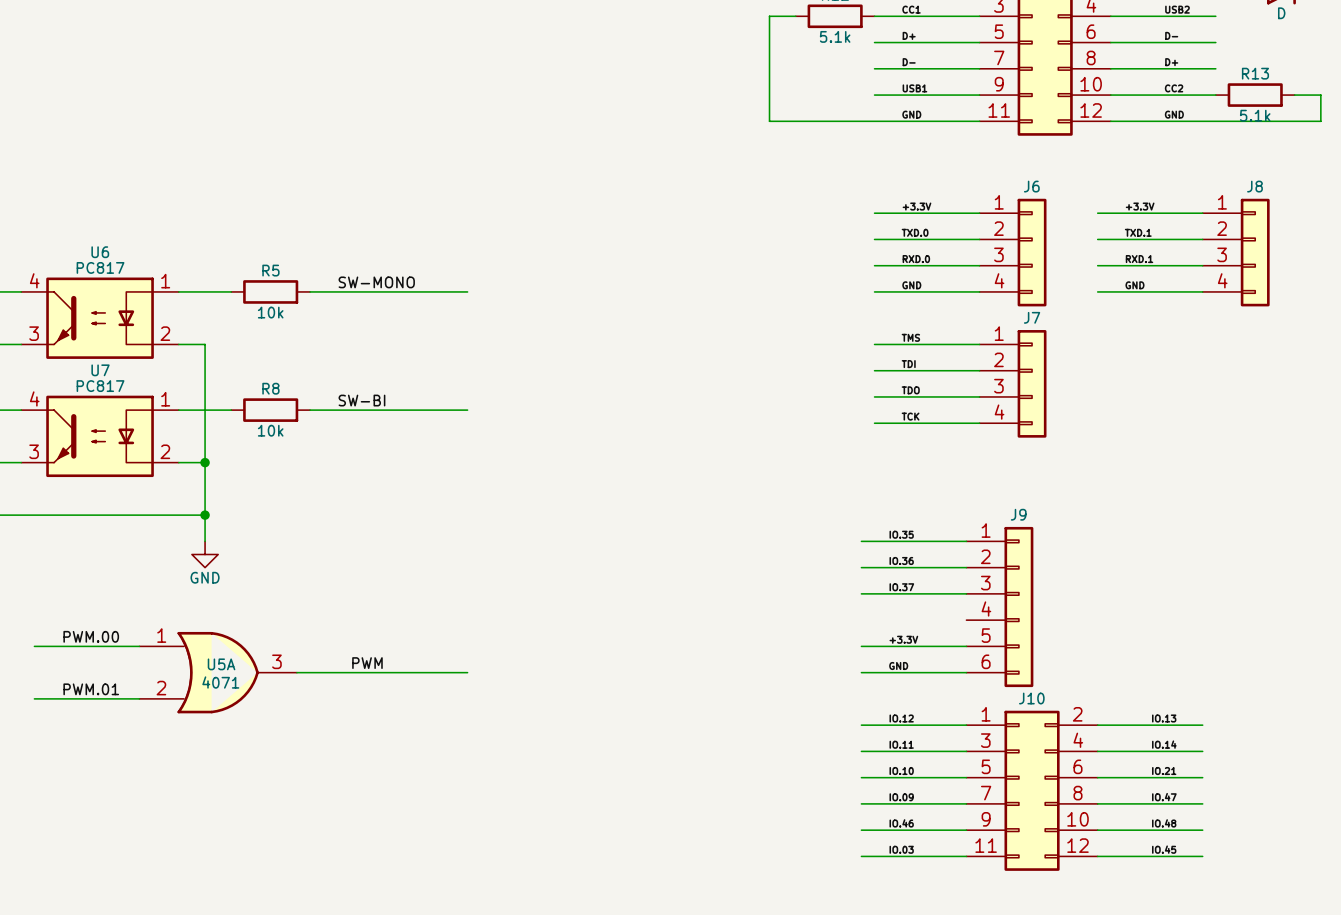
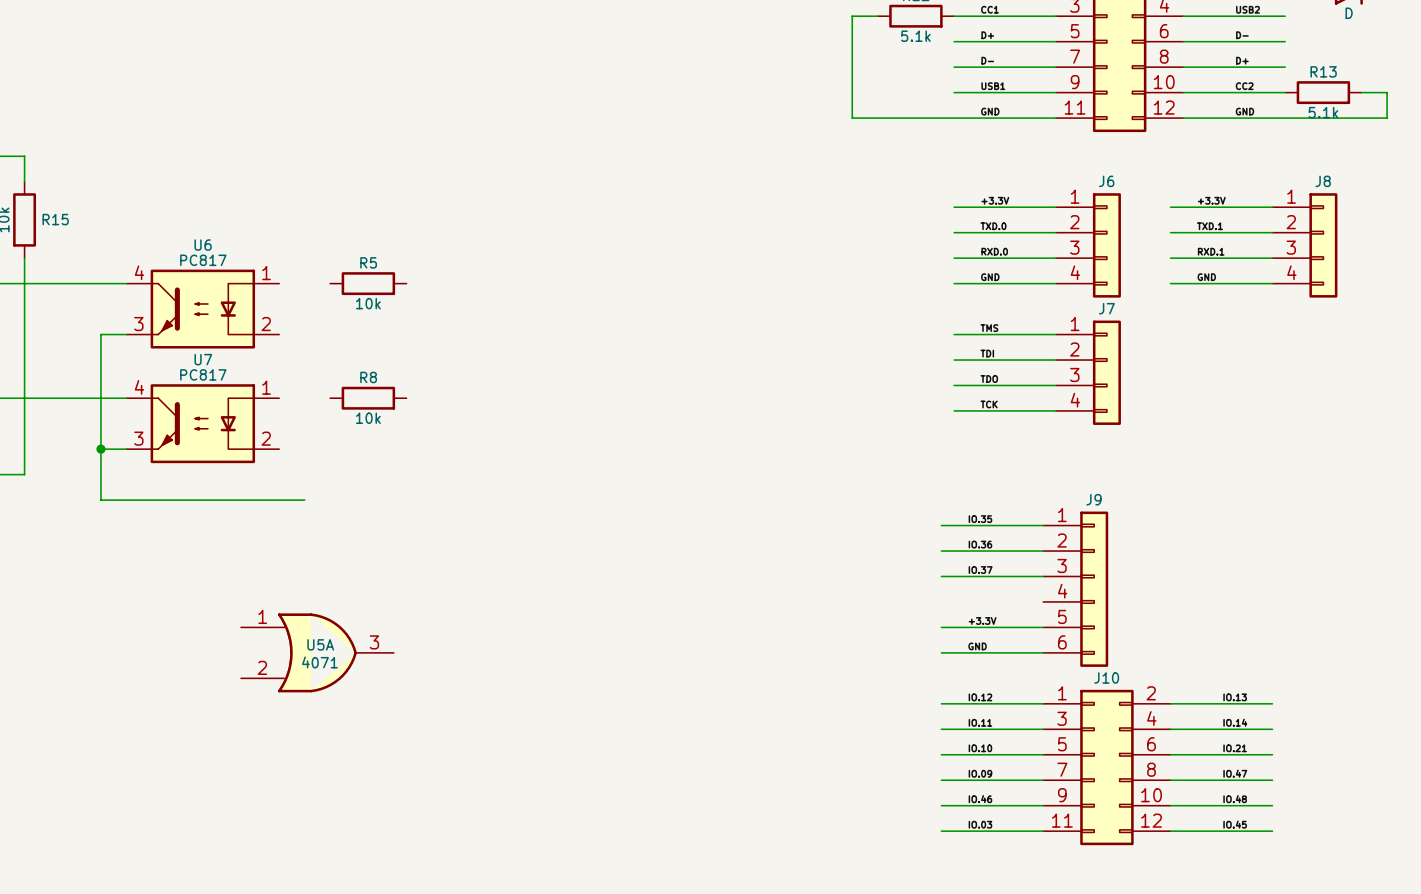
label: SW-MONO (376, 282) -> none
wire: (178, 291) (231, 291) -> none
wire: (310, 291) (467, 291) -> none
wire: (178, 344) (205, 344) (205, 541) -> none
label: SW-BI (361, 400) -> none
wire: (178, 410) (231, 410) -> none
wire: (310, 410) (467, 410) -> none
wire: (178, 462) (205, 462) -> none
junction: (205, 462) -> none
junction: (205, 515) -> none
power symbol: GND (205, 554) -> none
label: PWM.00 (91, 636) -> none
wire: (34, 646) (139, 646) -> none
label: PWM (367, 663) -> none
wire: (296, 672) (467, 672) -> none
label: PWM.01 (91, 689) -> none
wire: (34, 698) (139, 698) -> none

